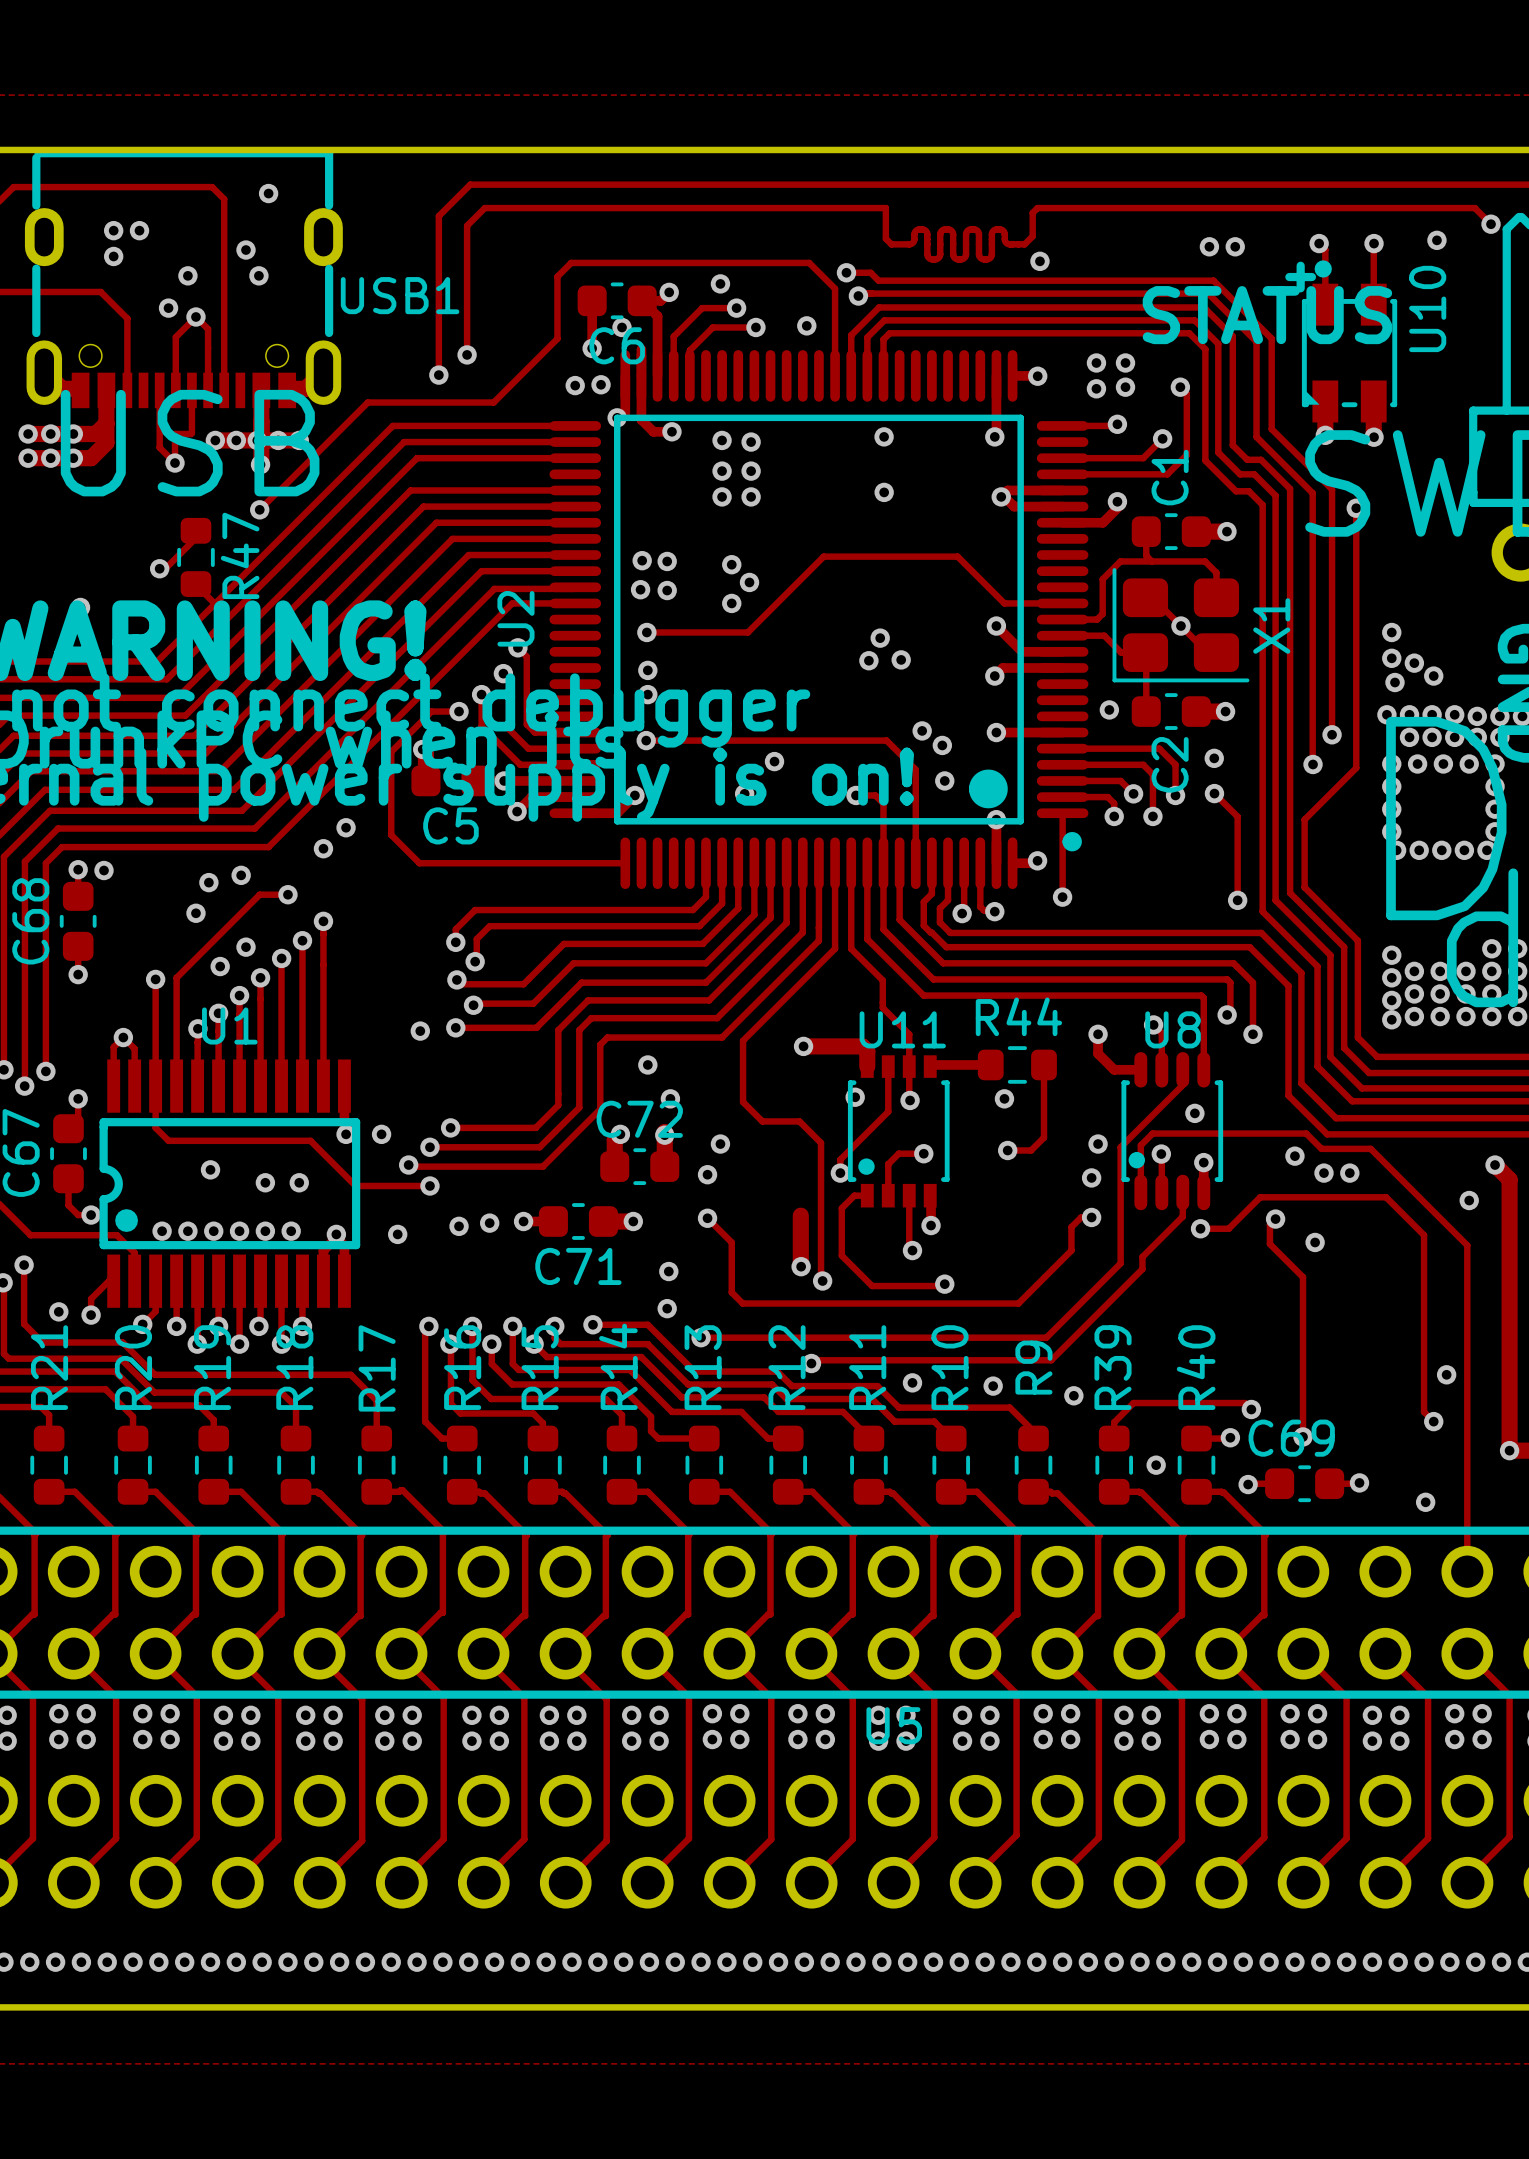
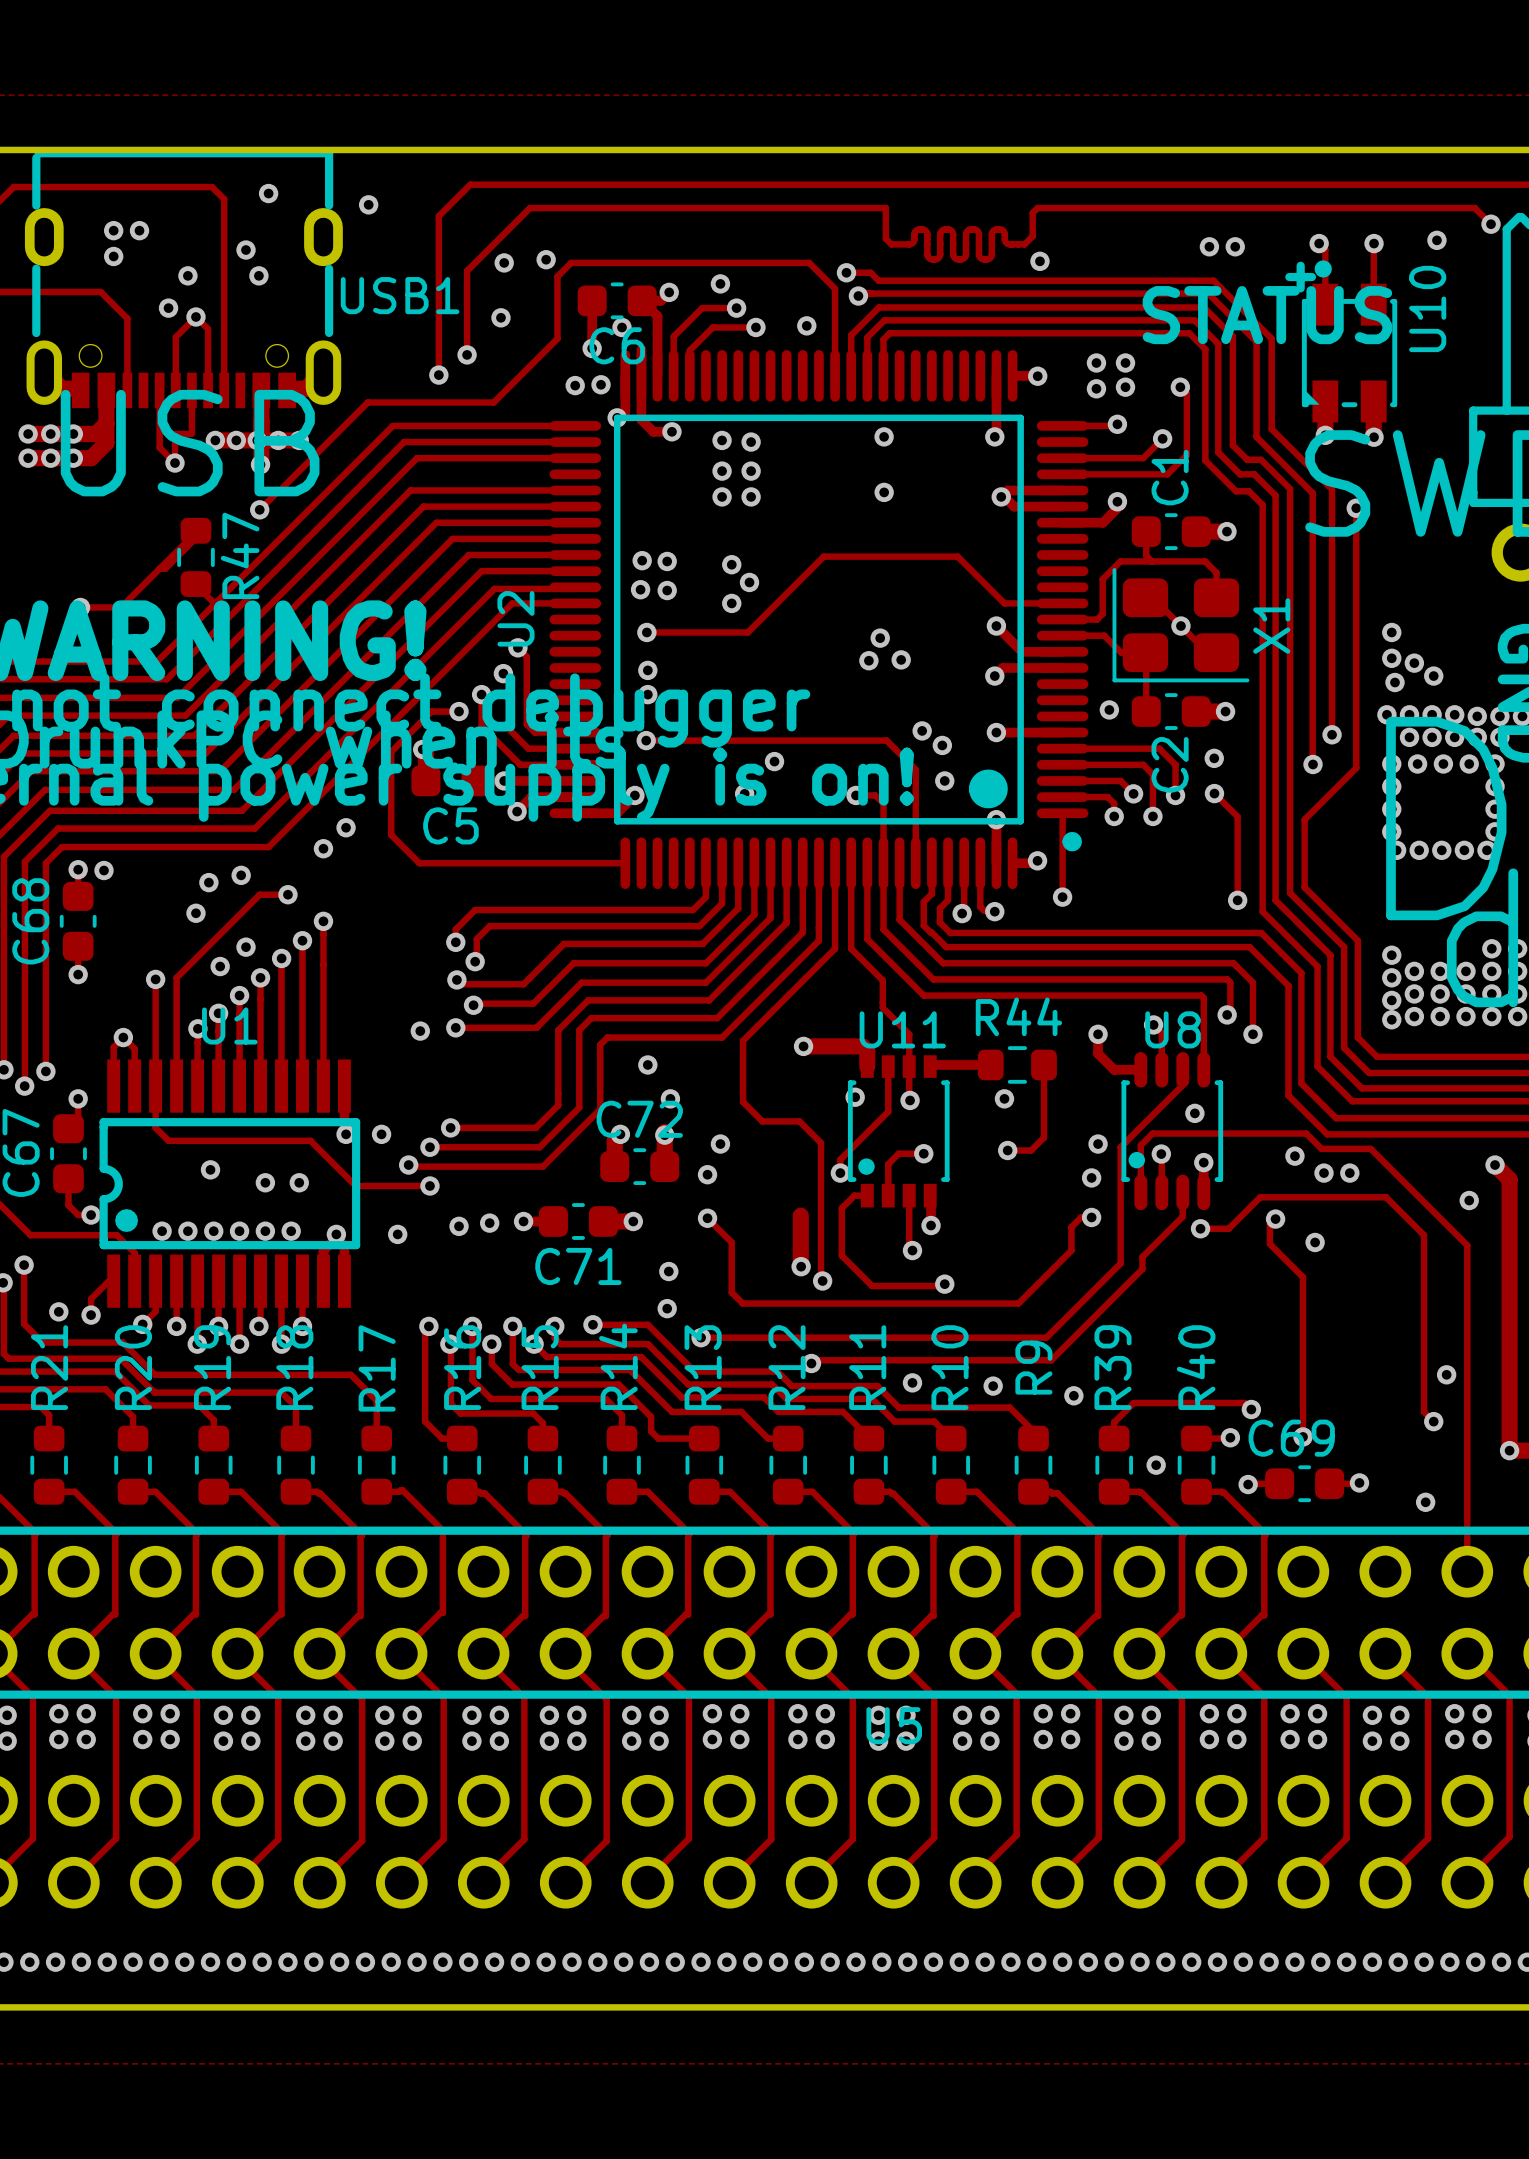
via: none -> (368, 204)
track: (530, 208) (484, 208) (467, 225) (467, 271) -> (530, 208) (467, 271)
via: none -> (546, 259)
via: none -> (504, 262)
via: none -> (500, 317)
track: none -> (195, 530) (120, 607) (80, 607)
via: (159, 568) -> none

